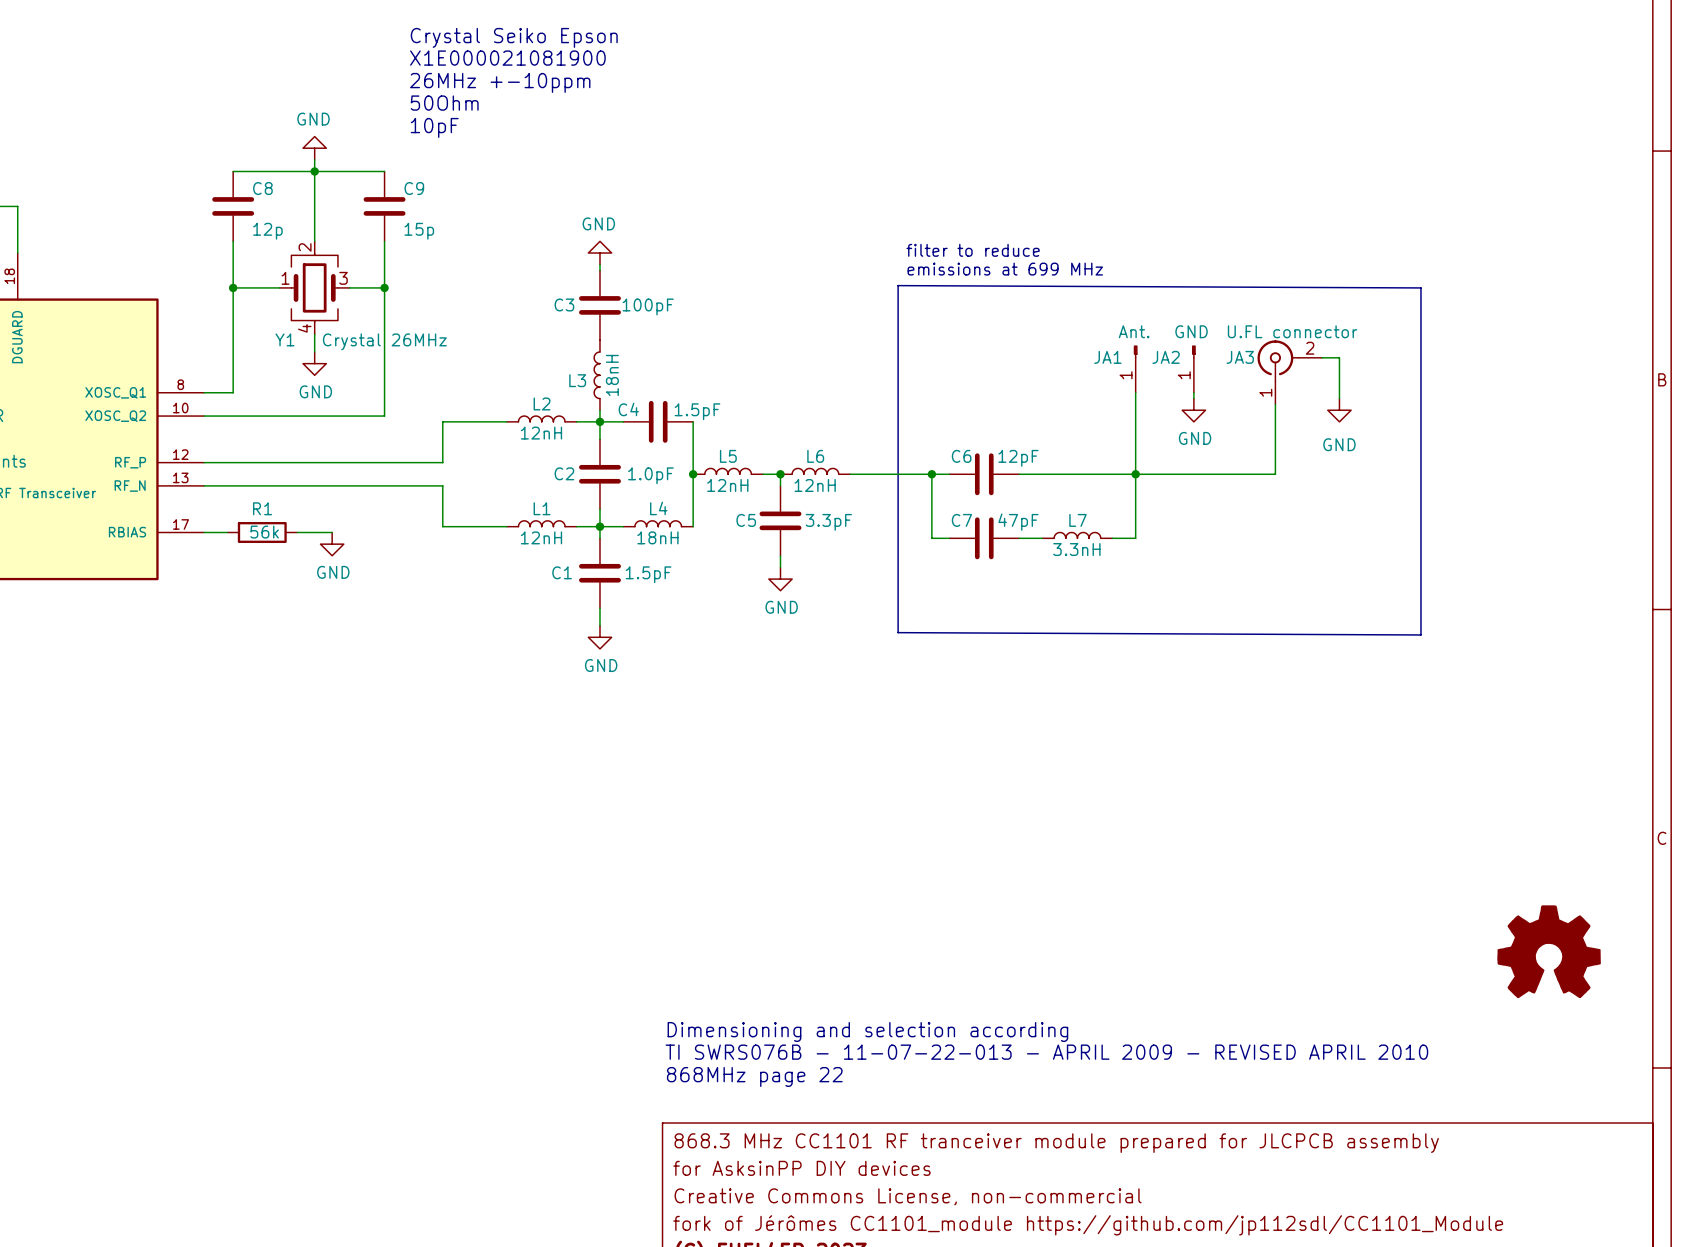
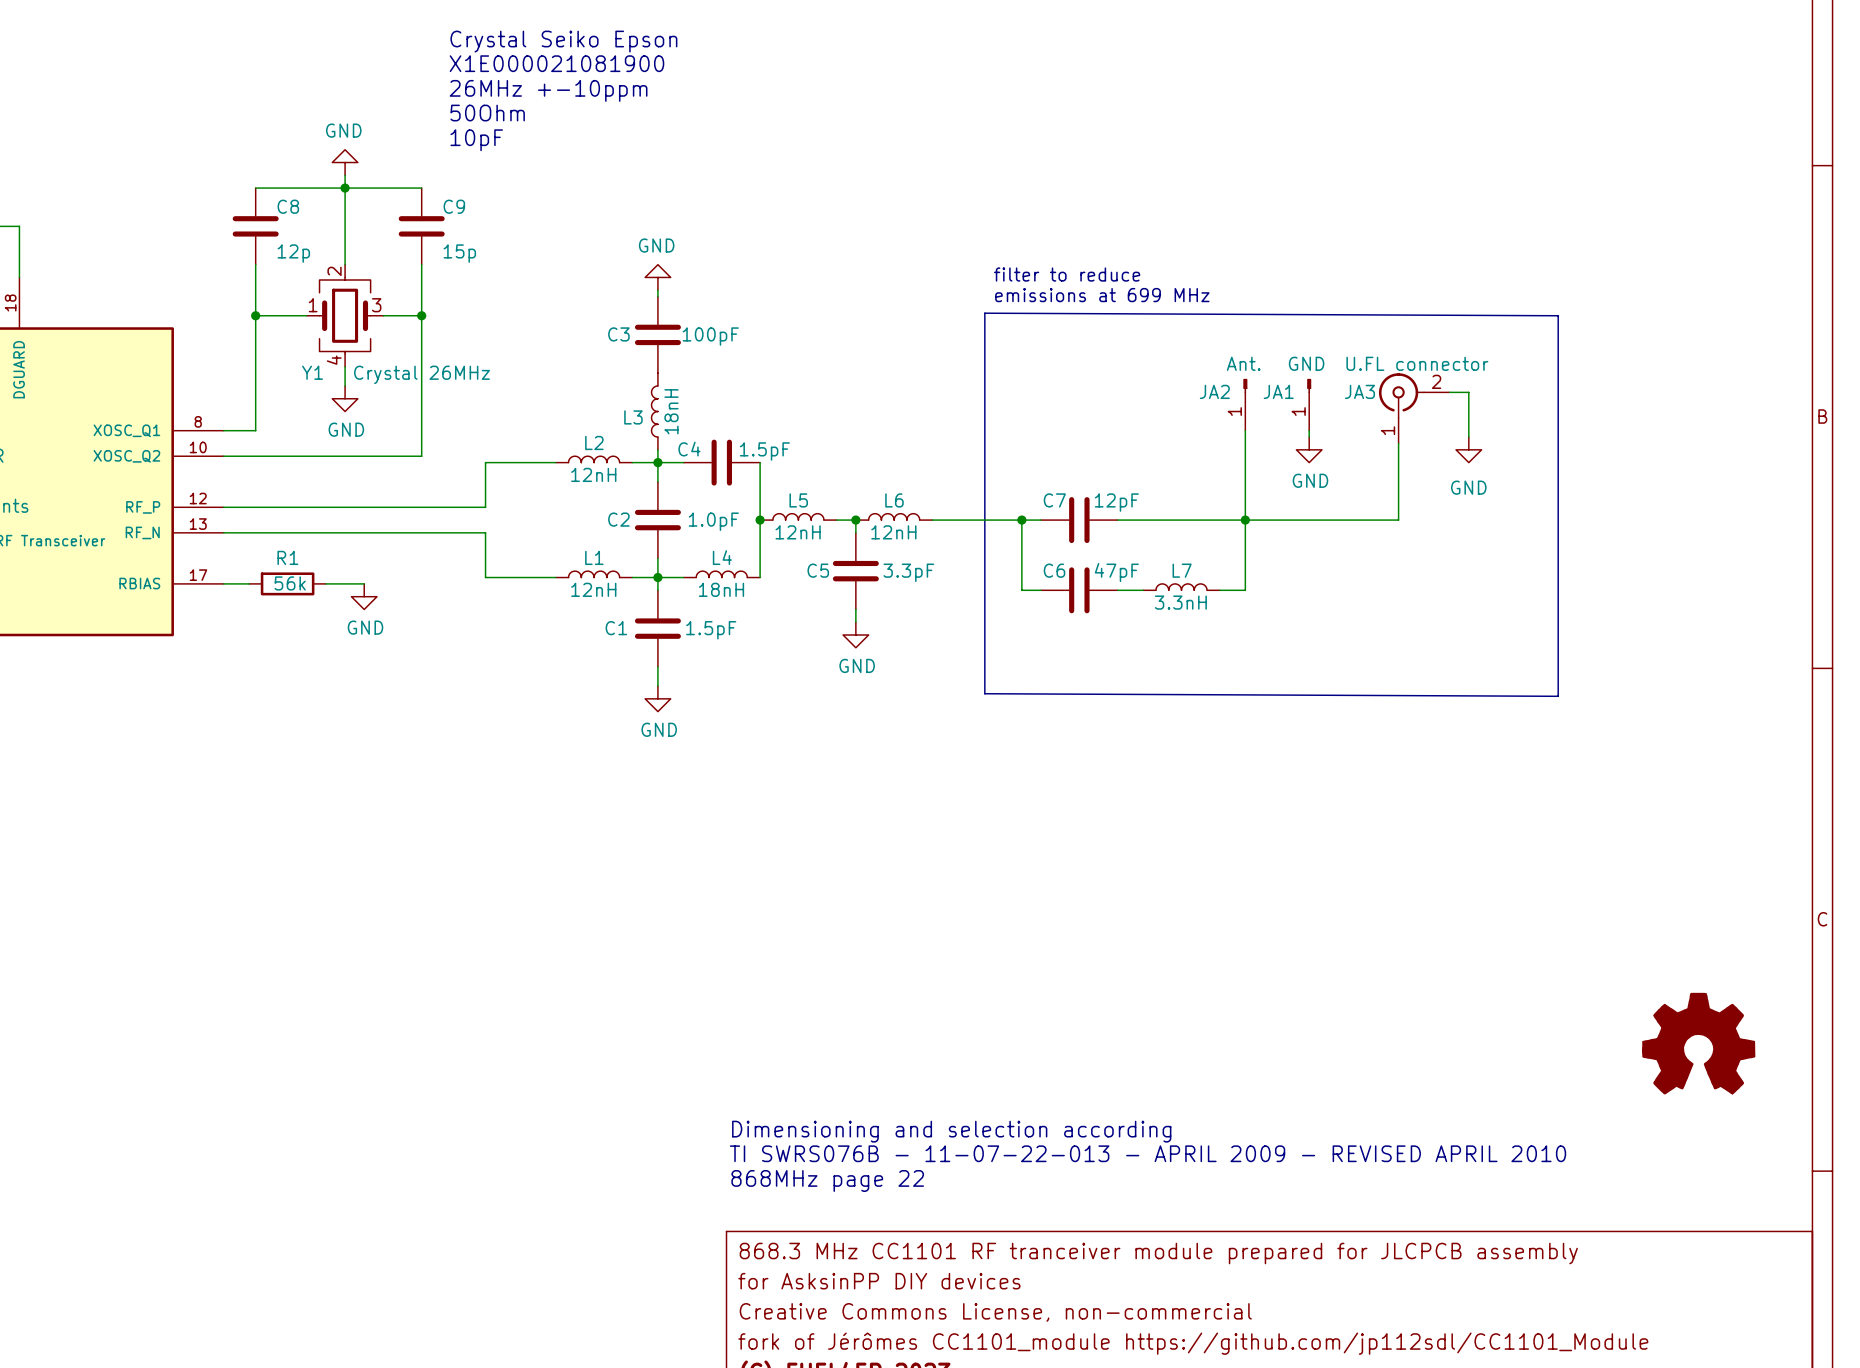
JA1 name: JA1 (1107, 357) -> JA2 (1214, 391)
JA2 name: JA2 (1166, 357) -> JA1 (1278, 391)
C6 name: C6 (961, 456) -> C7 (1054, 500)
C7 name: C7 (961, 520) -> C6 (1054, 570)

